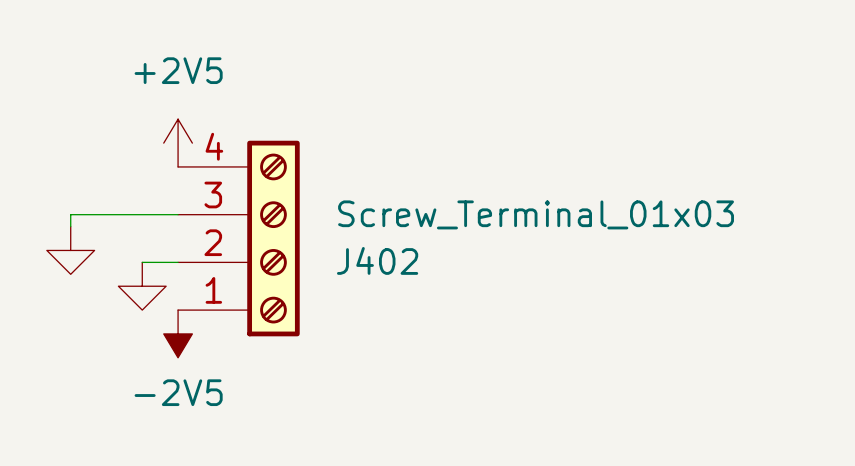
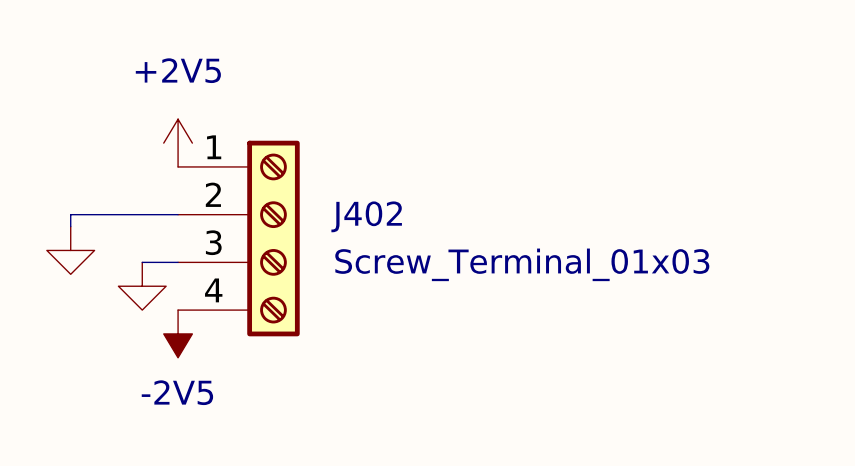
J402 flip: as is (273, 238) -> up-down (273, 238)

